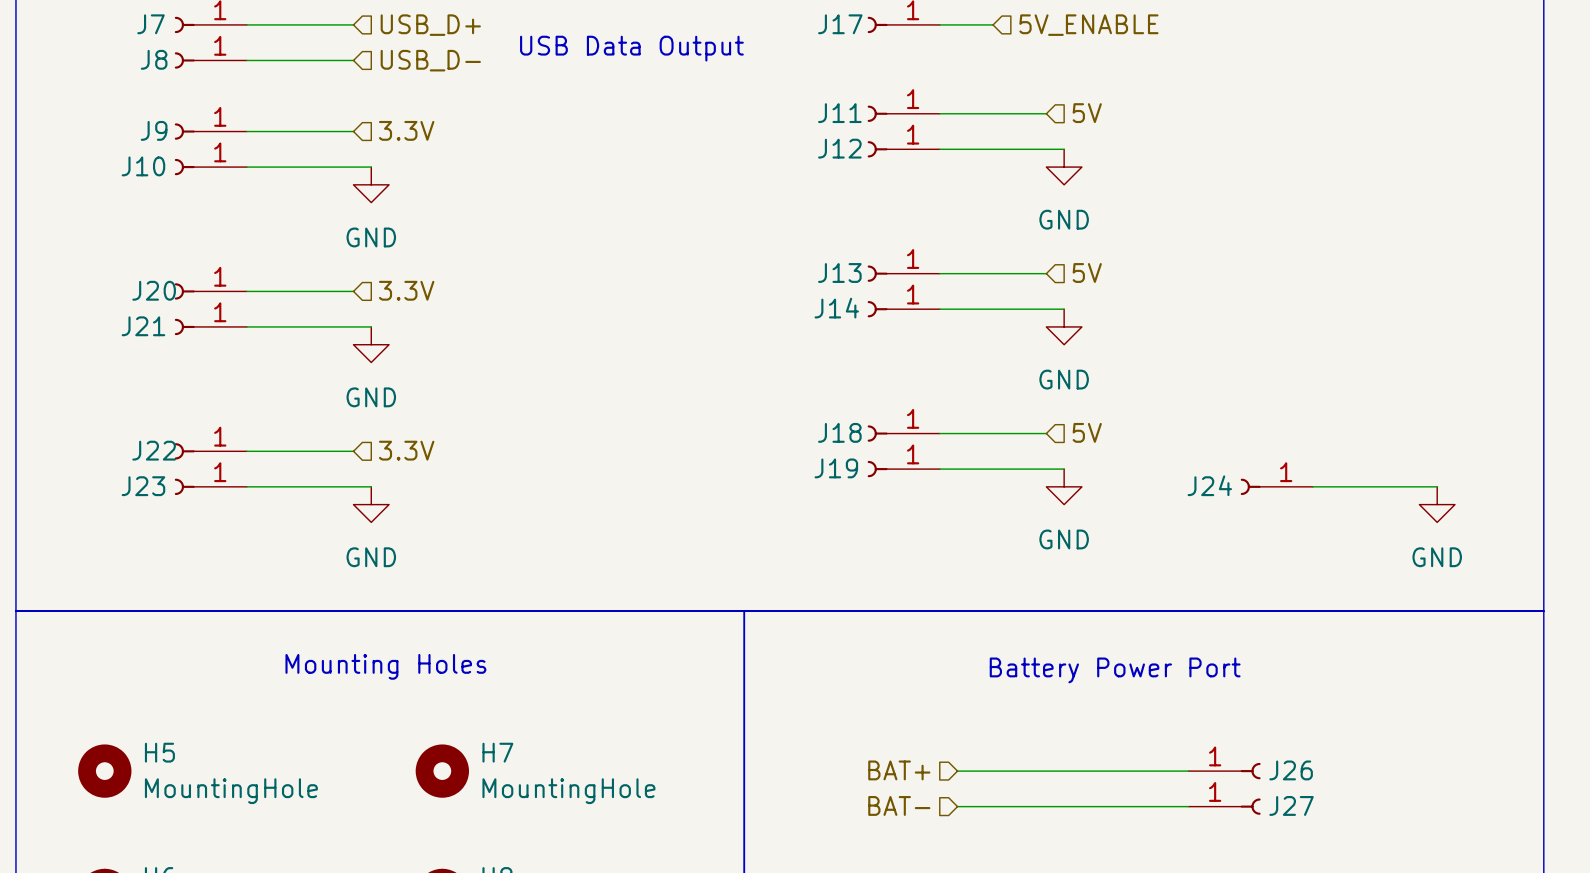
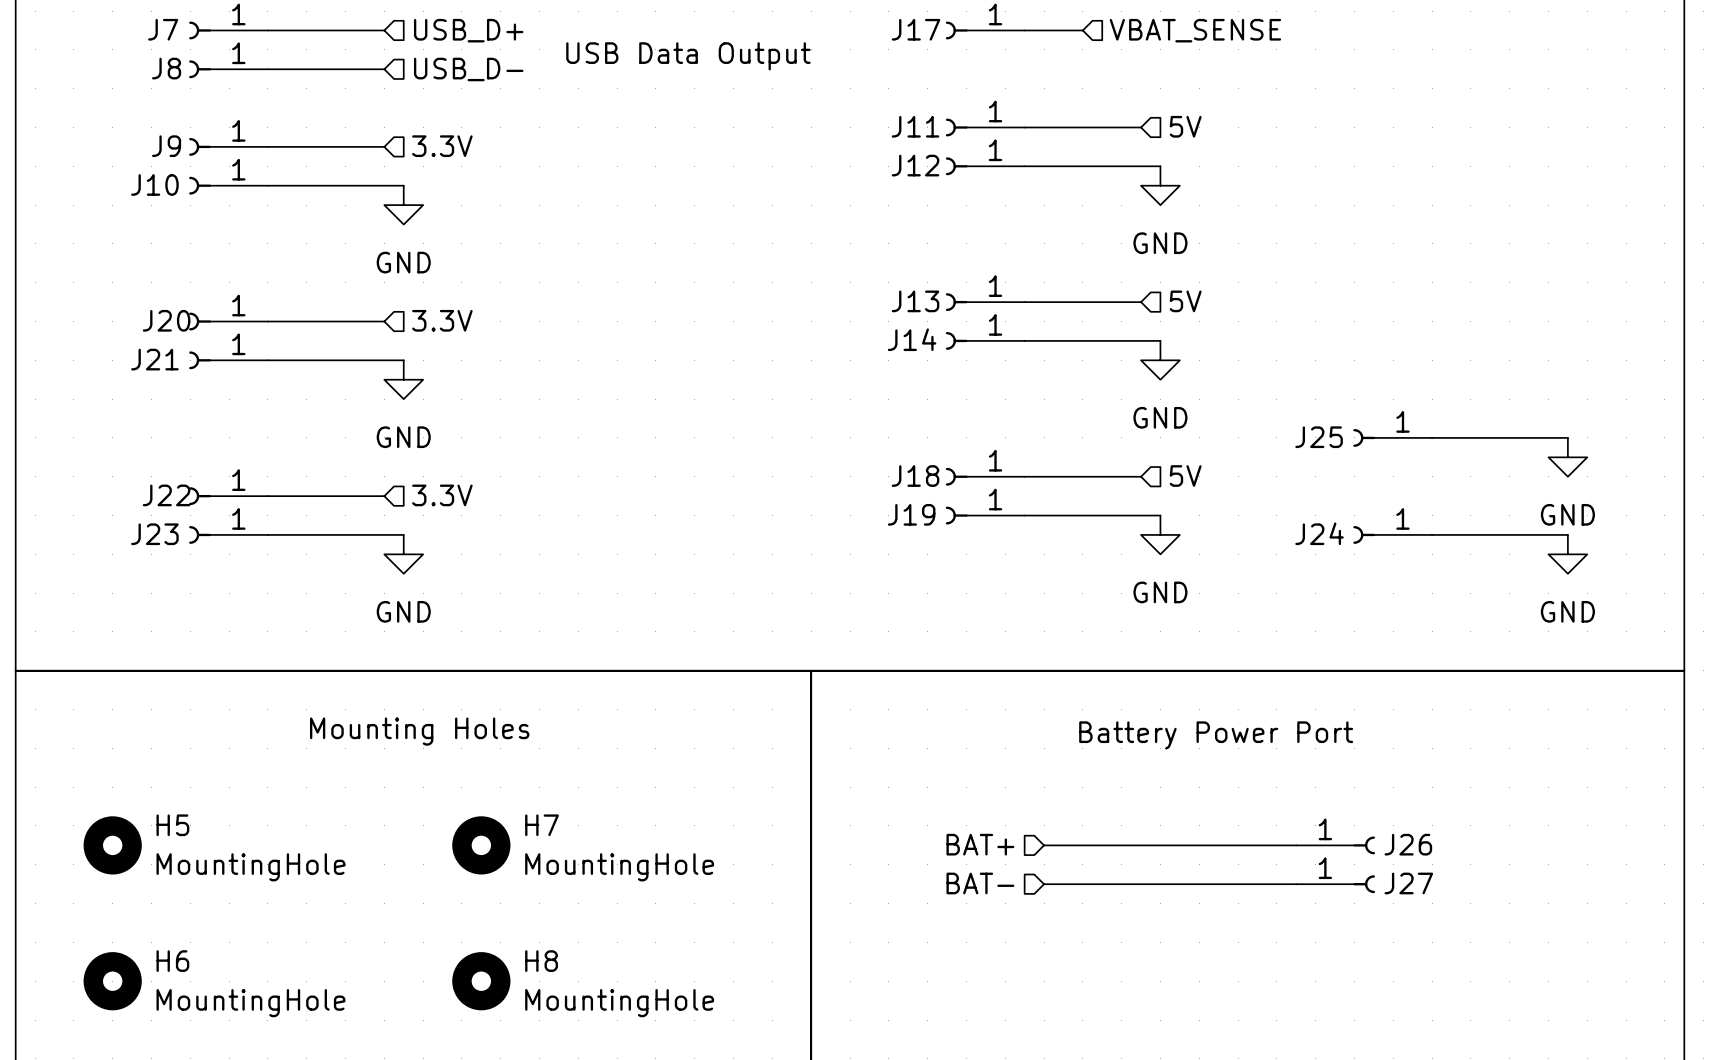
hierarchical label: 5V_ENABLE (1088, 25) -> VBAT_SENSE (1195, 30)
J25: none -> (1392, 437)
wire: none -> (1432, 437) (1567, 437)
power symbol: none -> GND (1567, 457)

